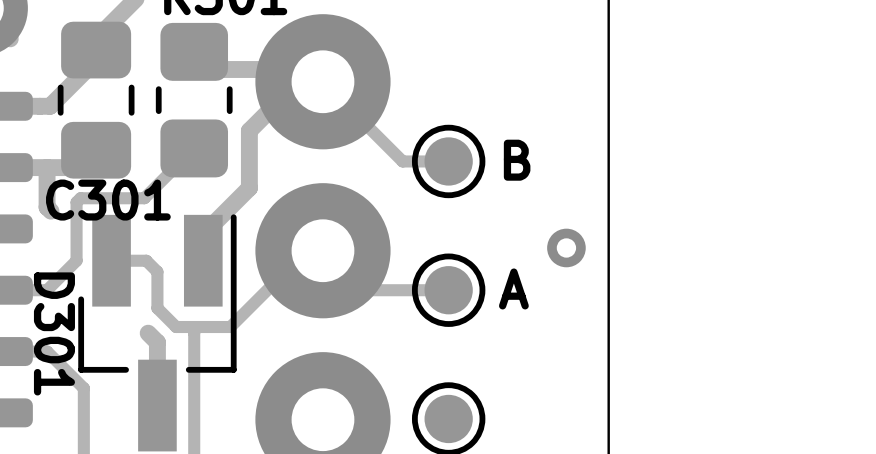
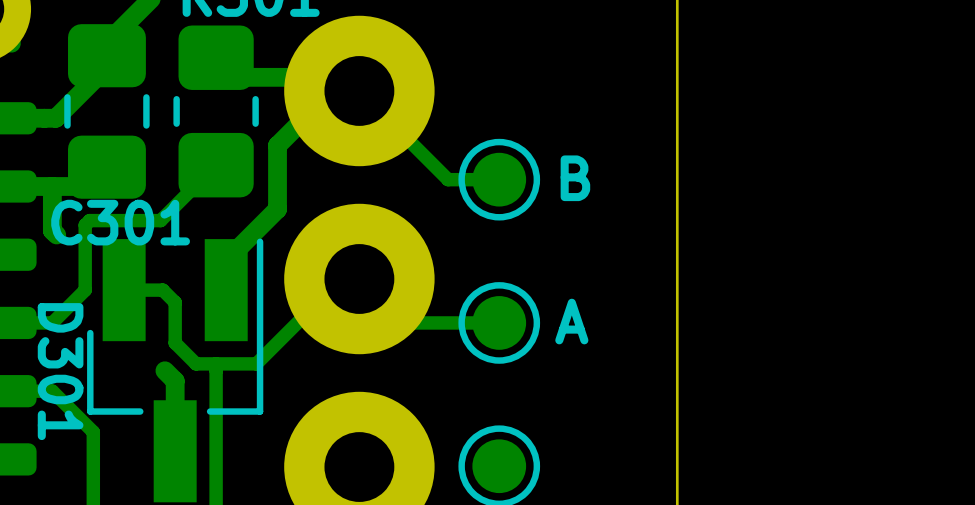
via: (566, 247) -> none

